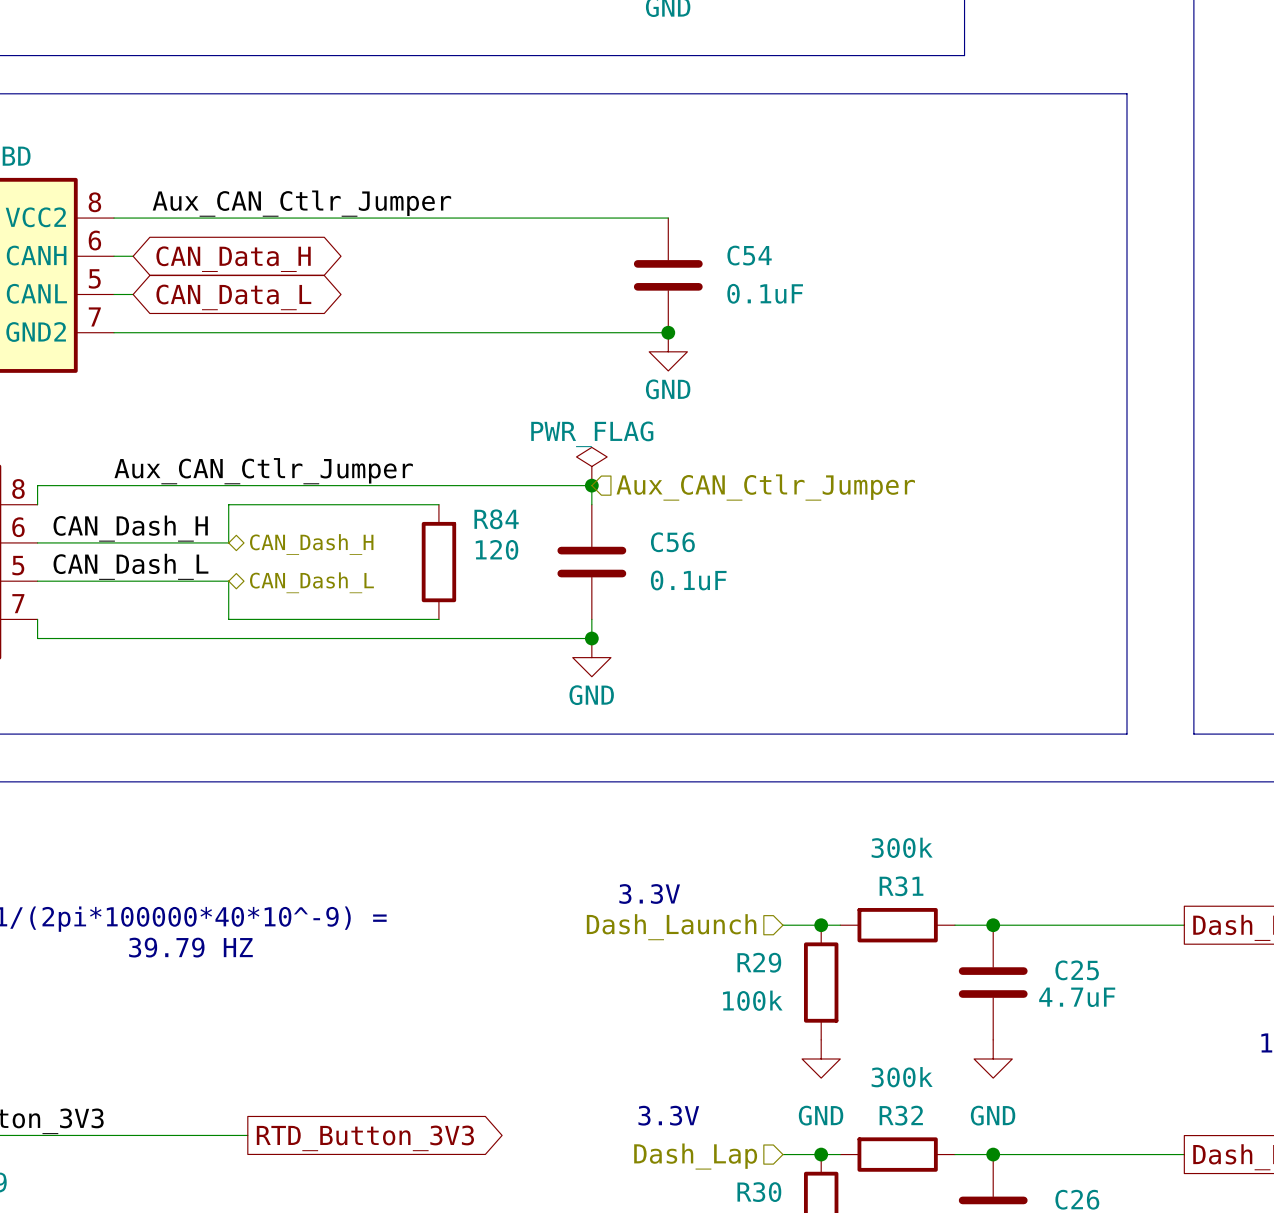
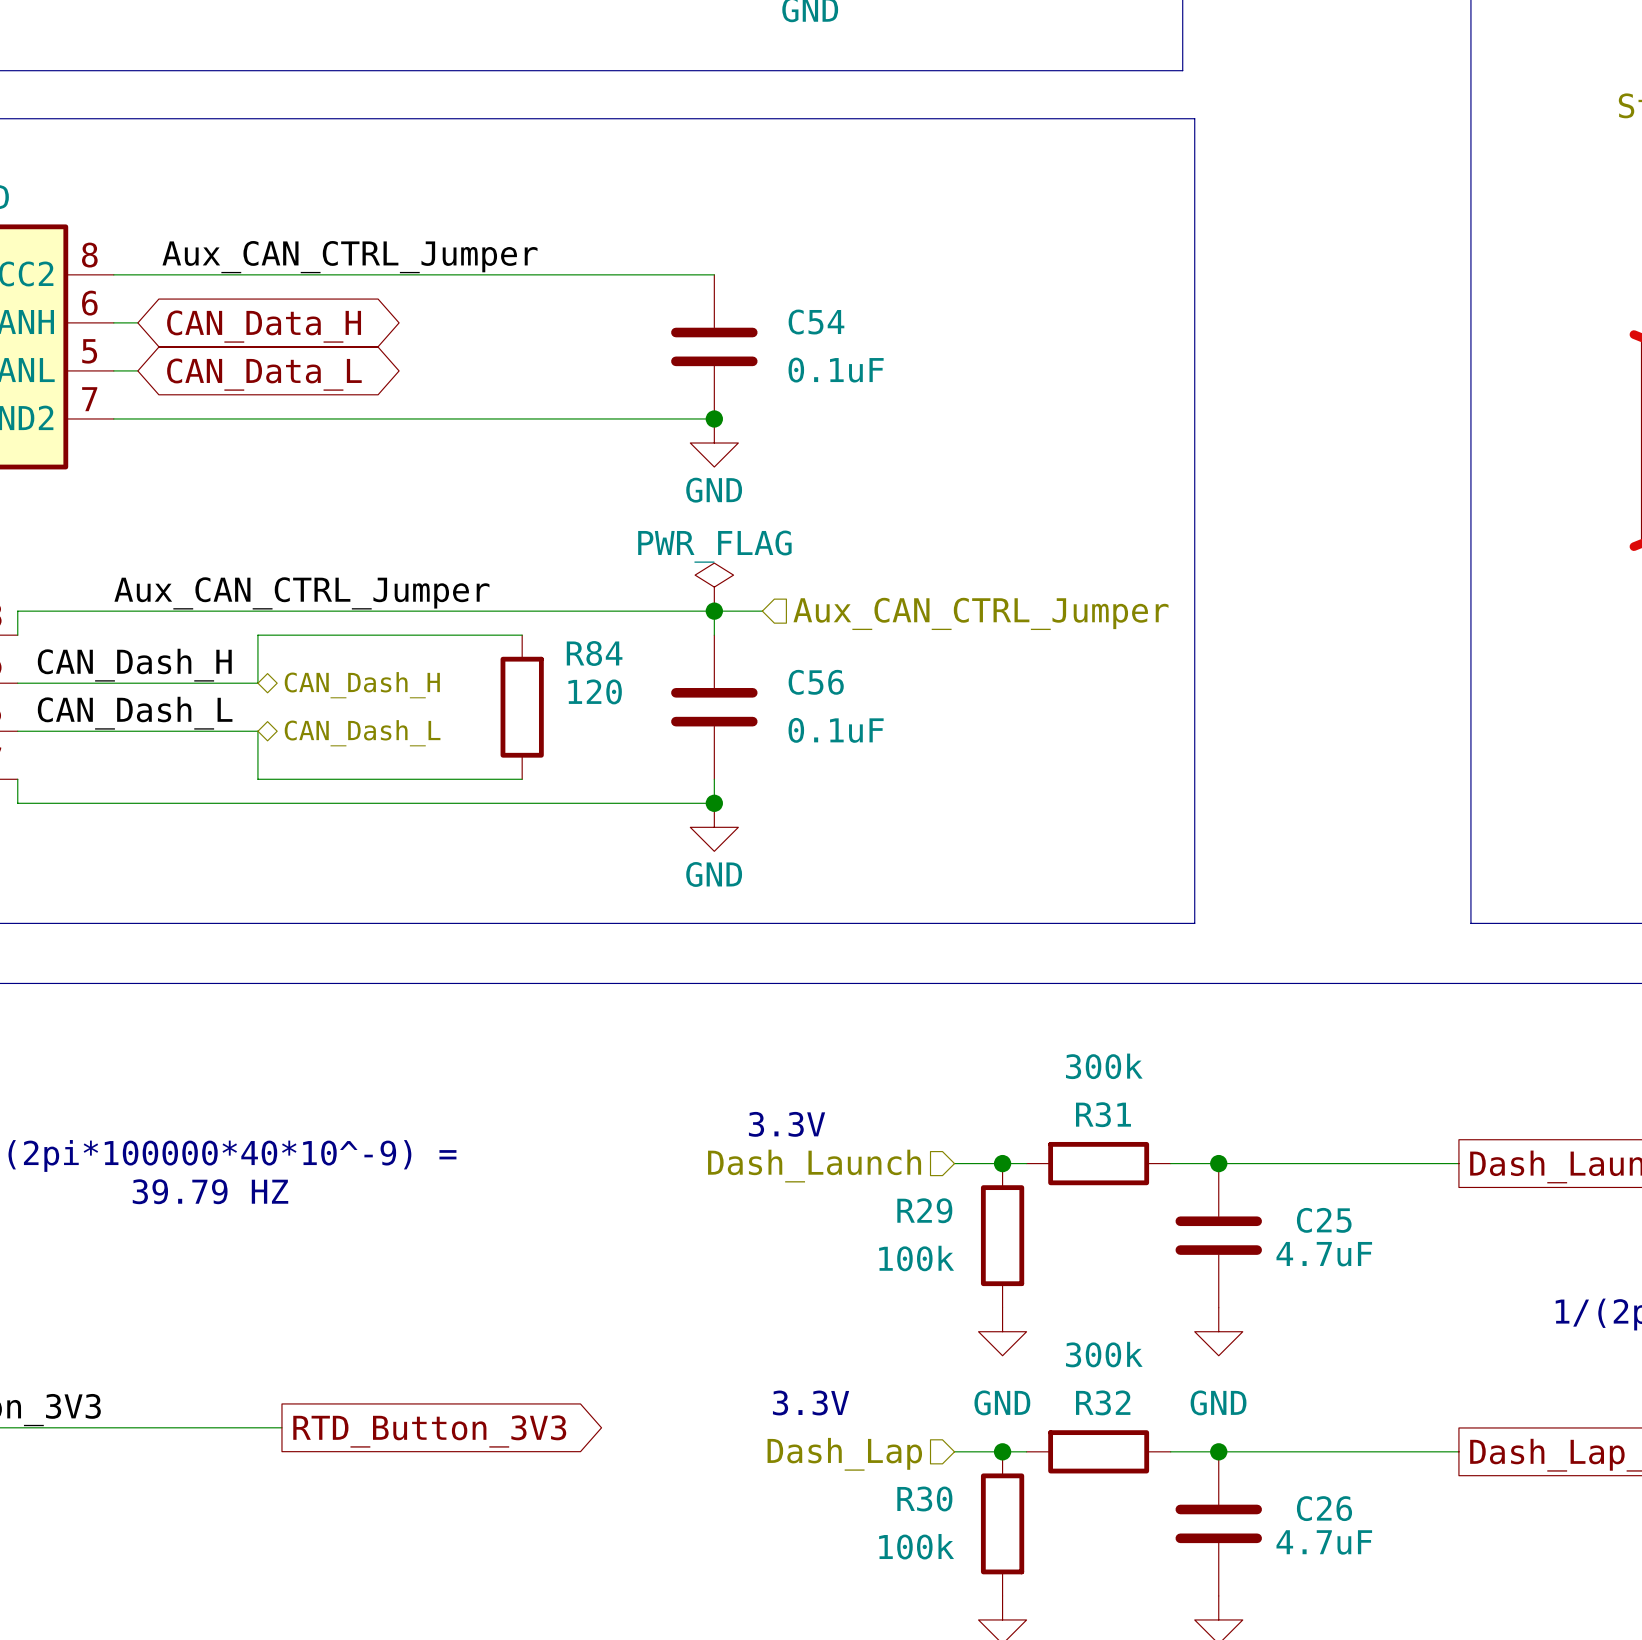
line: (974, 93) (1126, 93) (1126, 734) (974, 734) -> (1194, 118) (1194, 923)
label: Aux_CAN_Ctlr_Jumper (301, 203) -> Aux_CAN_CTRL_Jumper (349, 257)
wire: (591, 218) (668, 218) -> none
C54 position: (668, 275) -> (714, 346)
wire: (591, 332) (668, 332) -> none
junction position: (668, 332) -> (714, 418)
power symbol position: GND (668, 351) -> GND (714, 443)
label: Aux_CAN_Ctlr_Jumper (263, 471) -> Aux_CAN_CTRL_Jumper (301, 593)
wire: none -> (714, 611) (762, 611)
hierarchical label: Aux_CAN_Ctlr_Jumper (765, 487) -> Aux_CAN_CTRL_Jumper (980, 613)

